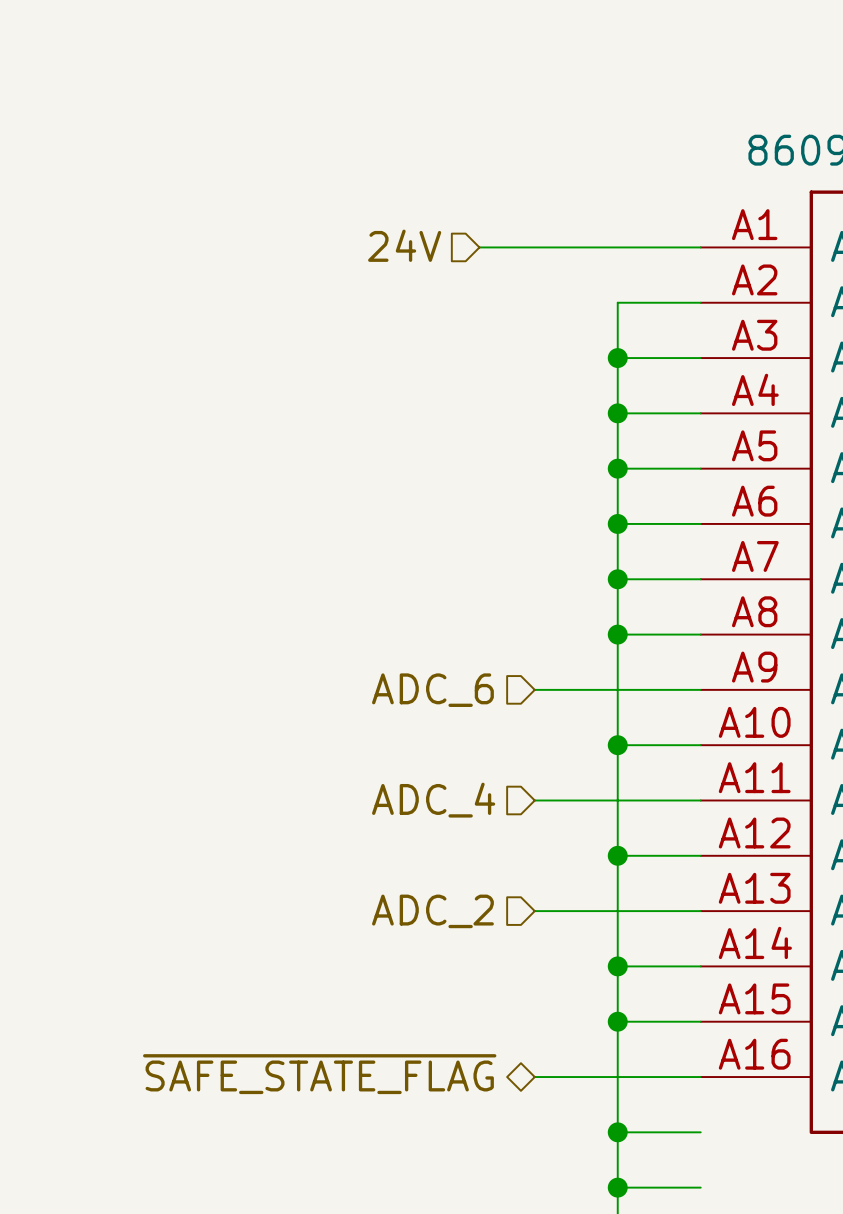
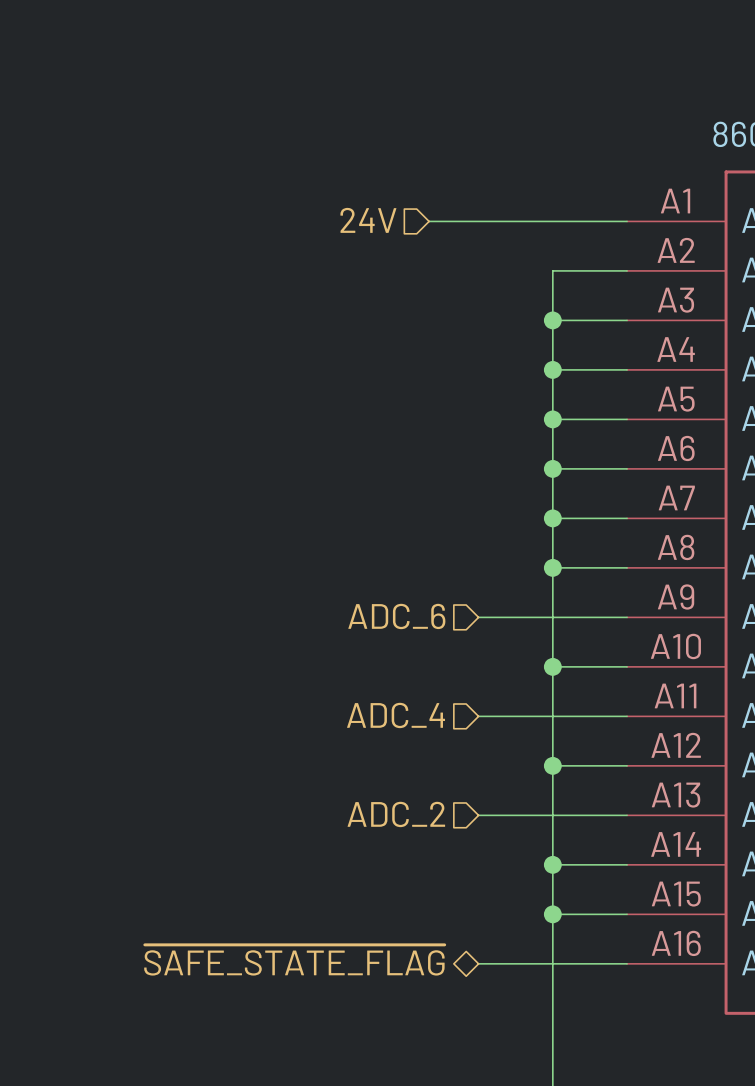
wire: (617, 1132) (700, 1132) -> none
junction: (617, 1132) -> none
wire: (617, 1187) (700, 1187) -> none
junction: (617, 1187) -> none

